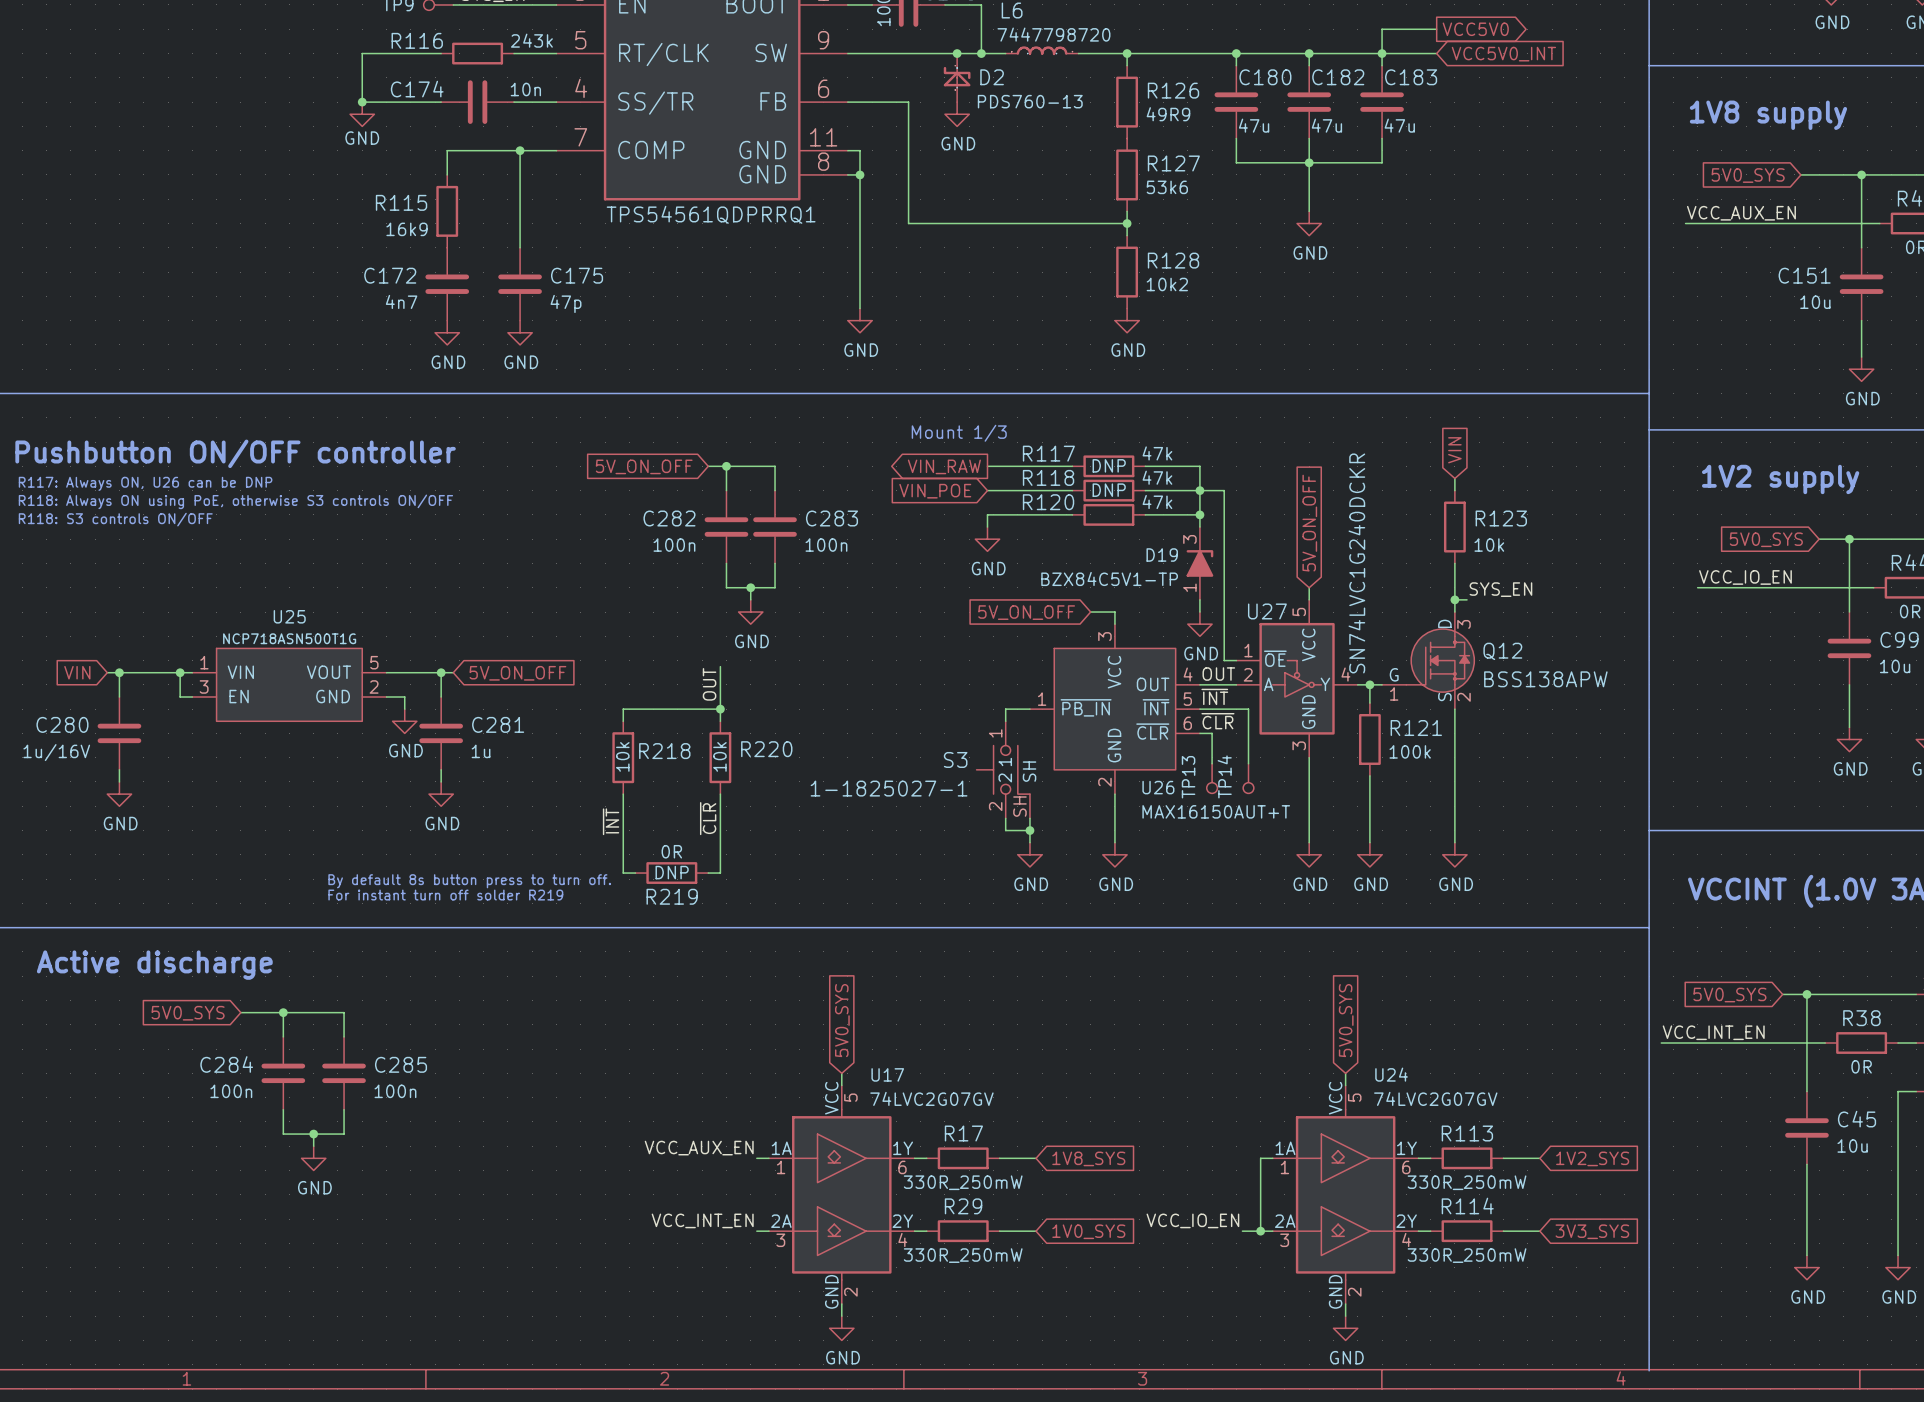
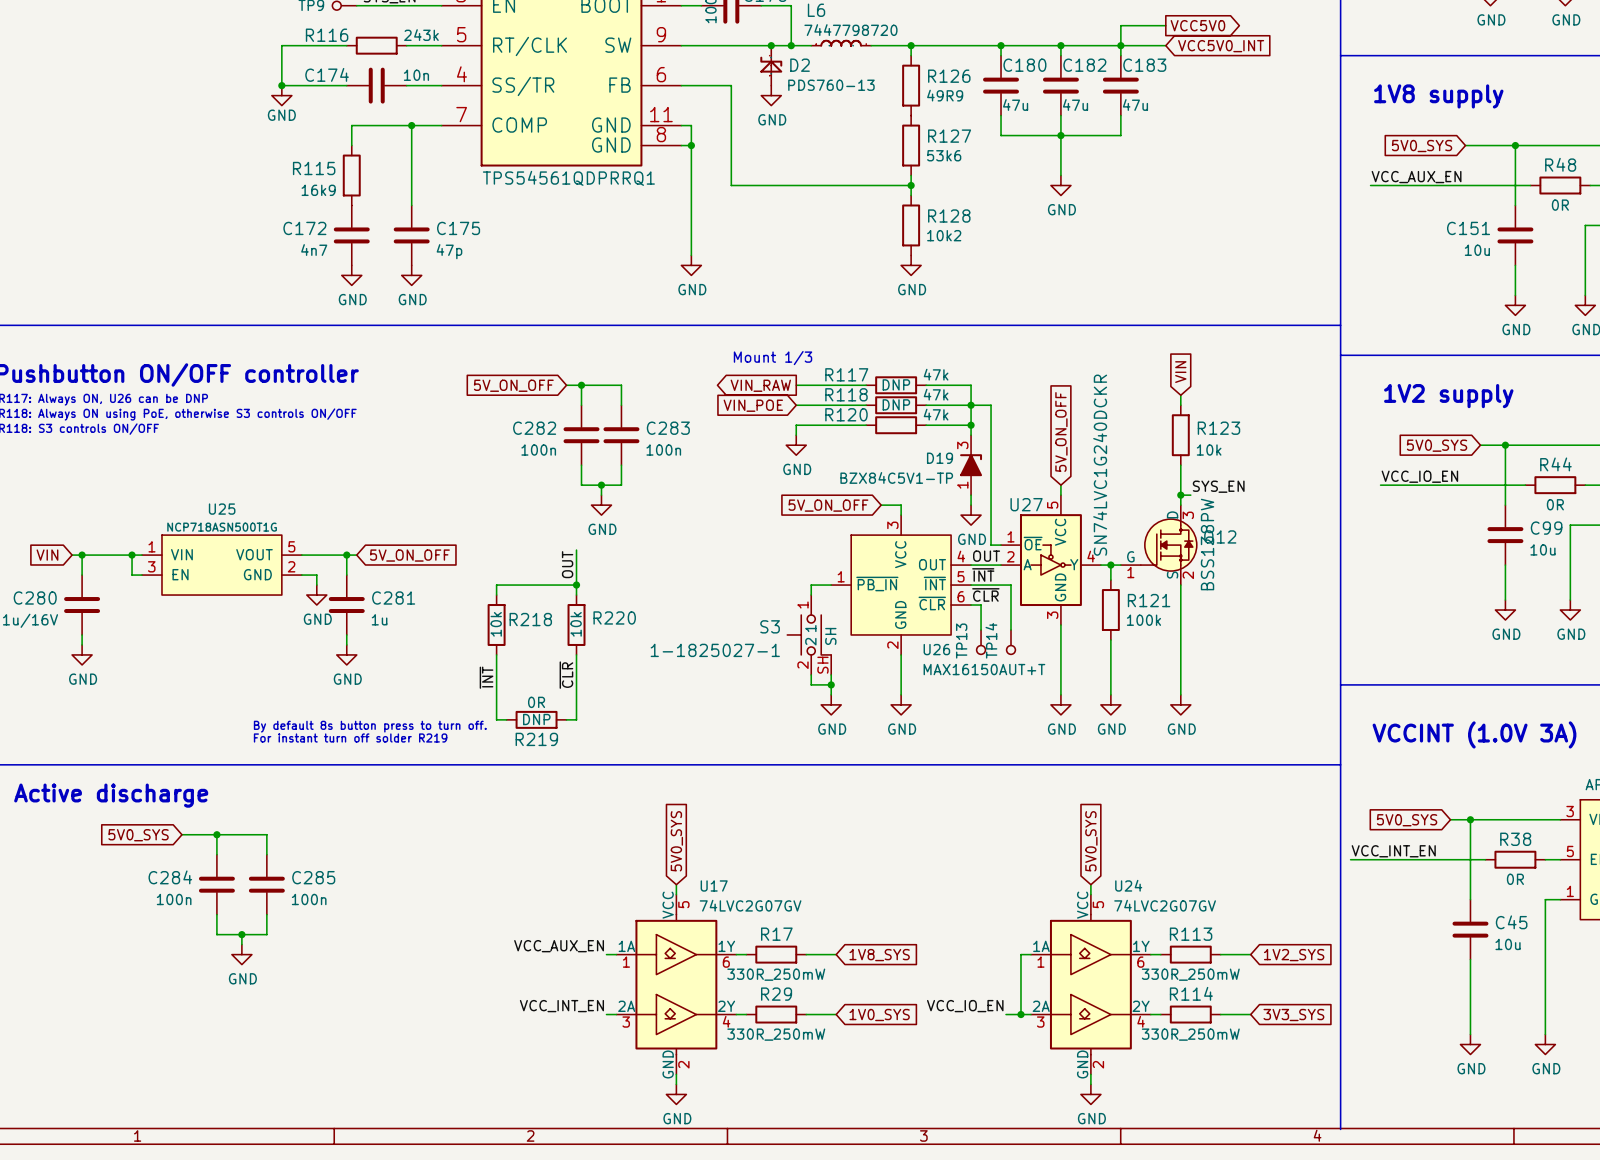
Q12 value: BSS138APW (1545, 679) -> BSS138PW (1207, 544)

